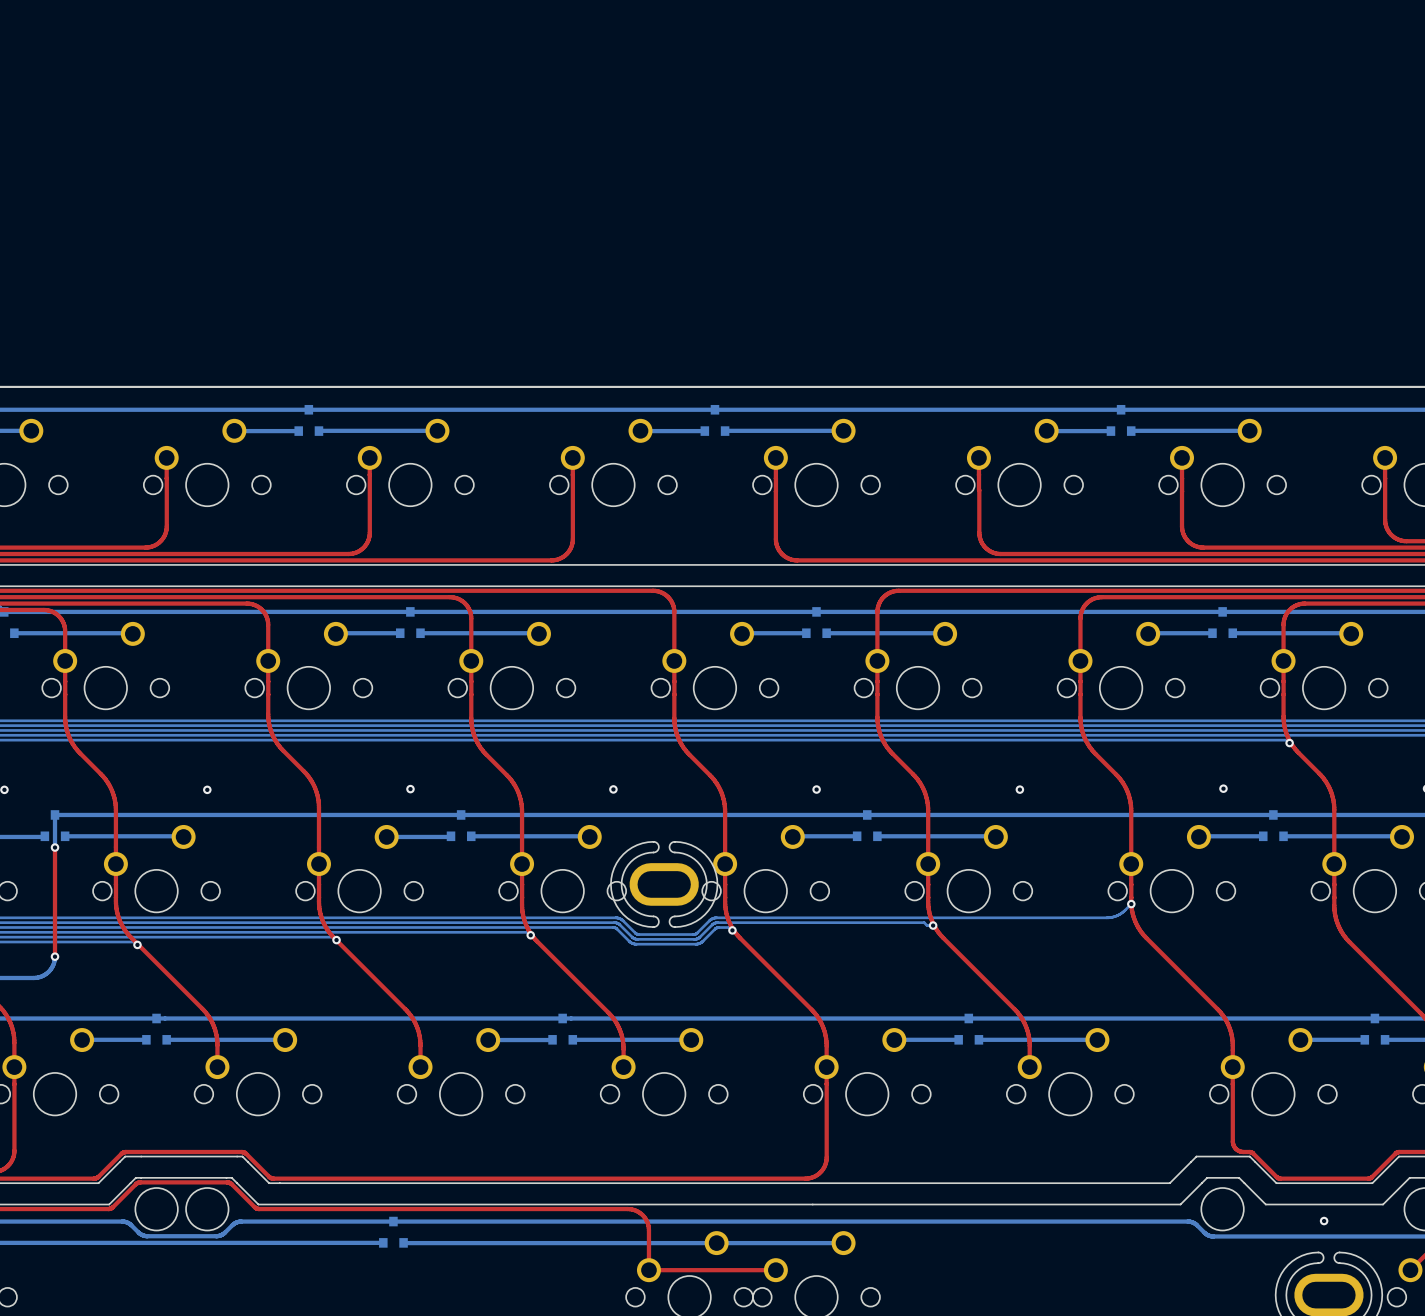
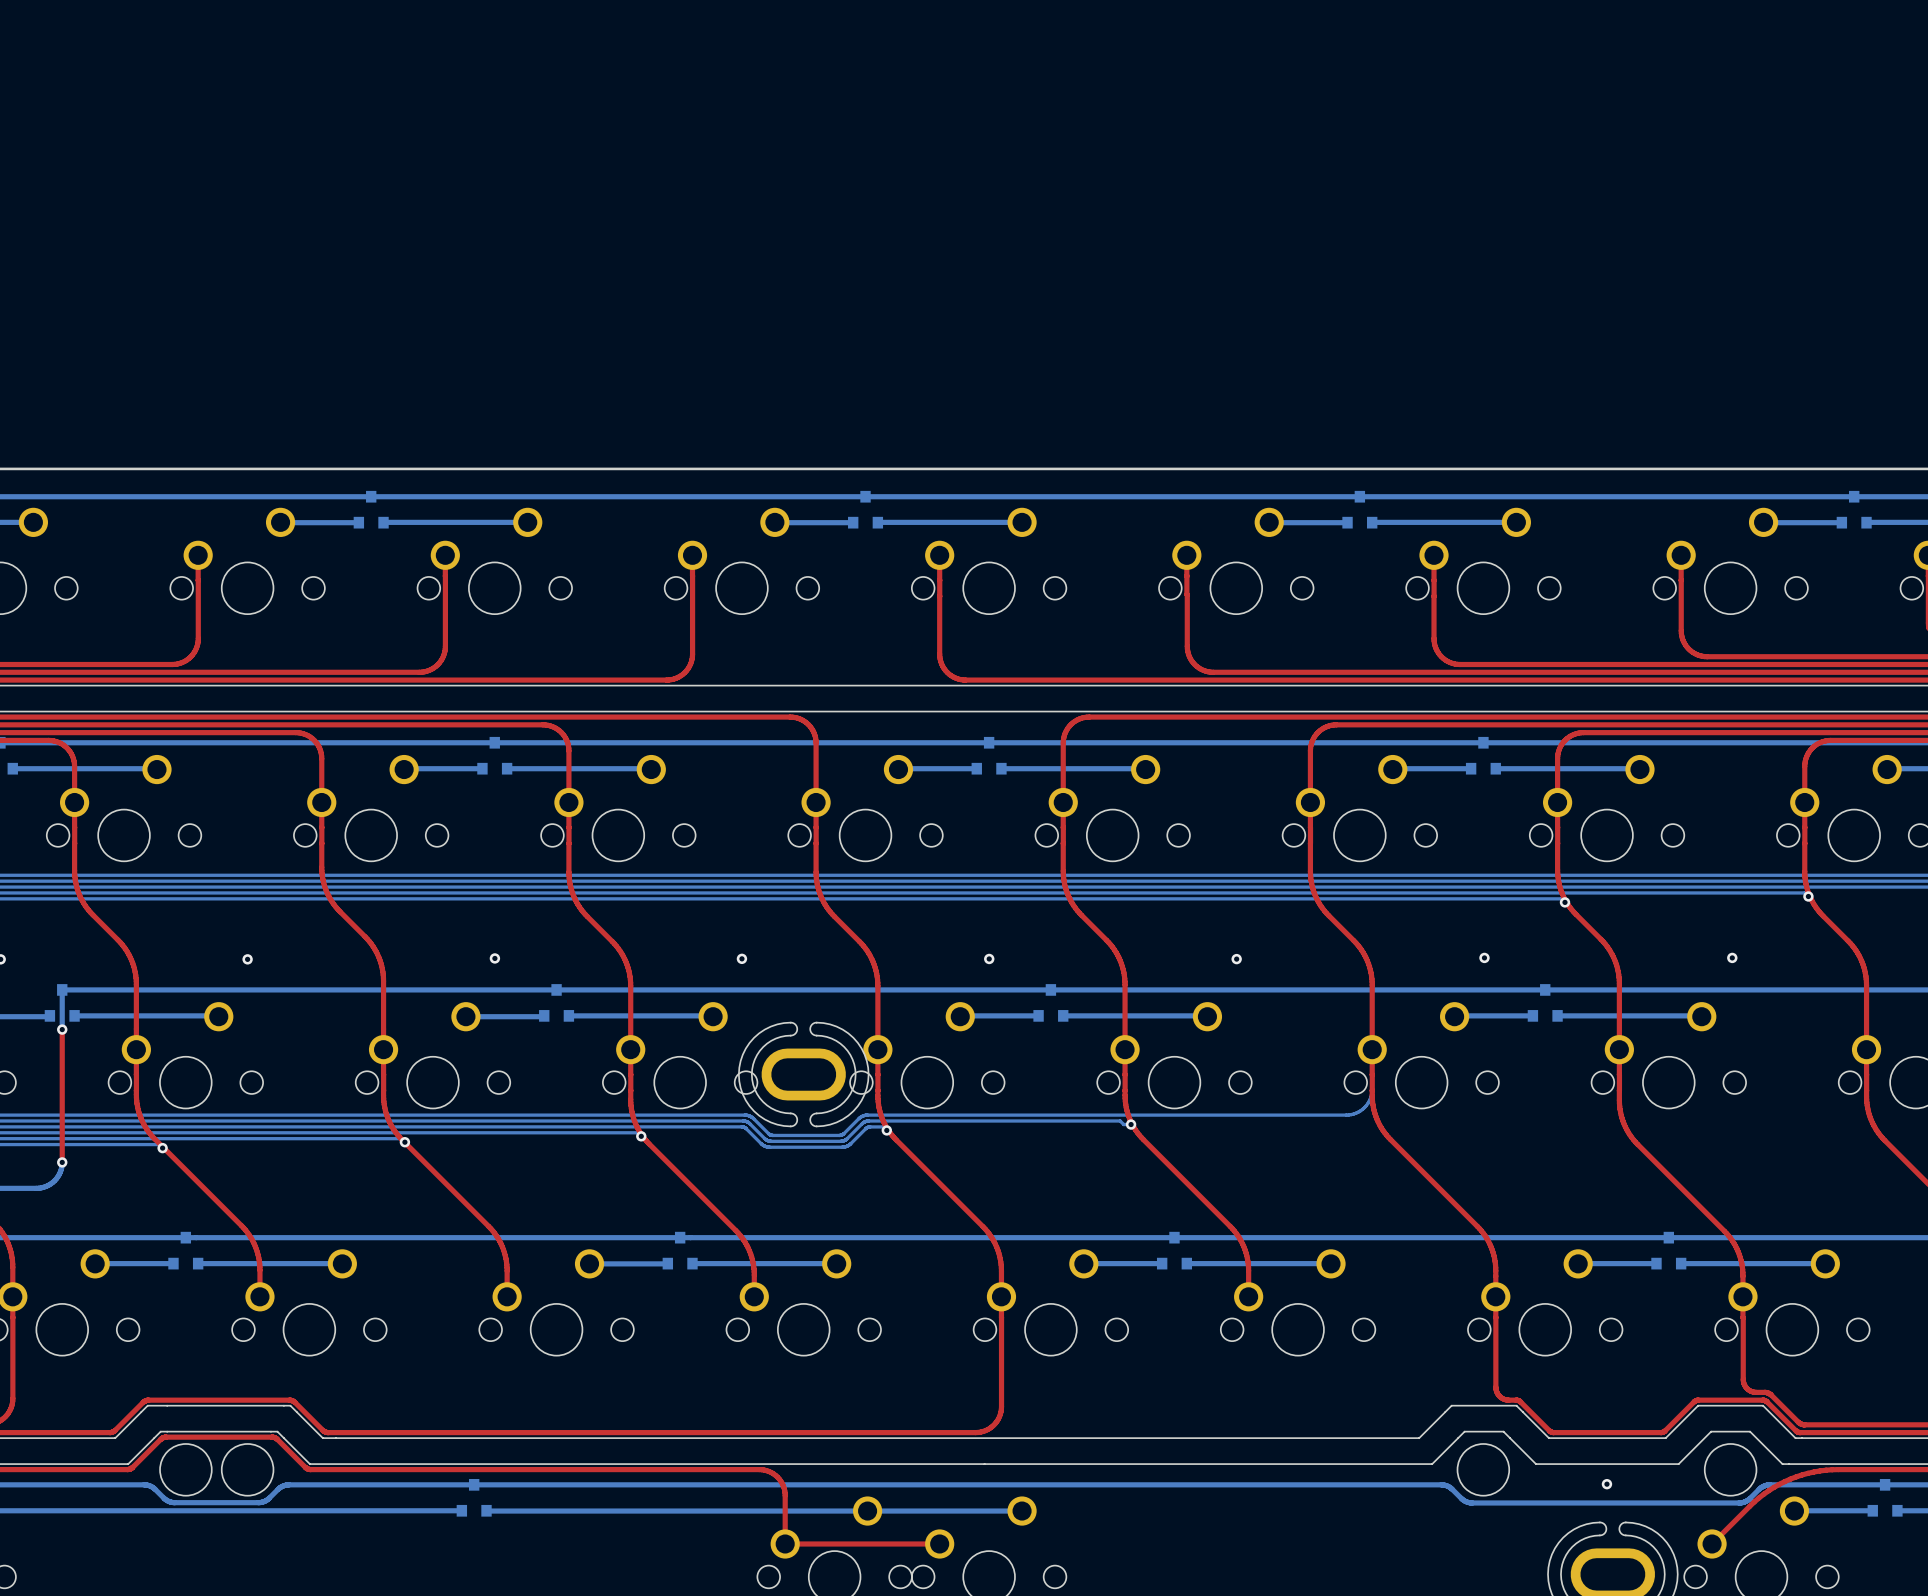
bottom track: (1131, 904) (1119, 914) (1106, 917) -> (1372, 1049) (1372, 1089) (1370, 1099) (1358, 1112) (1342, 1115)
via: (1131, 904) -> none

